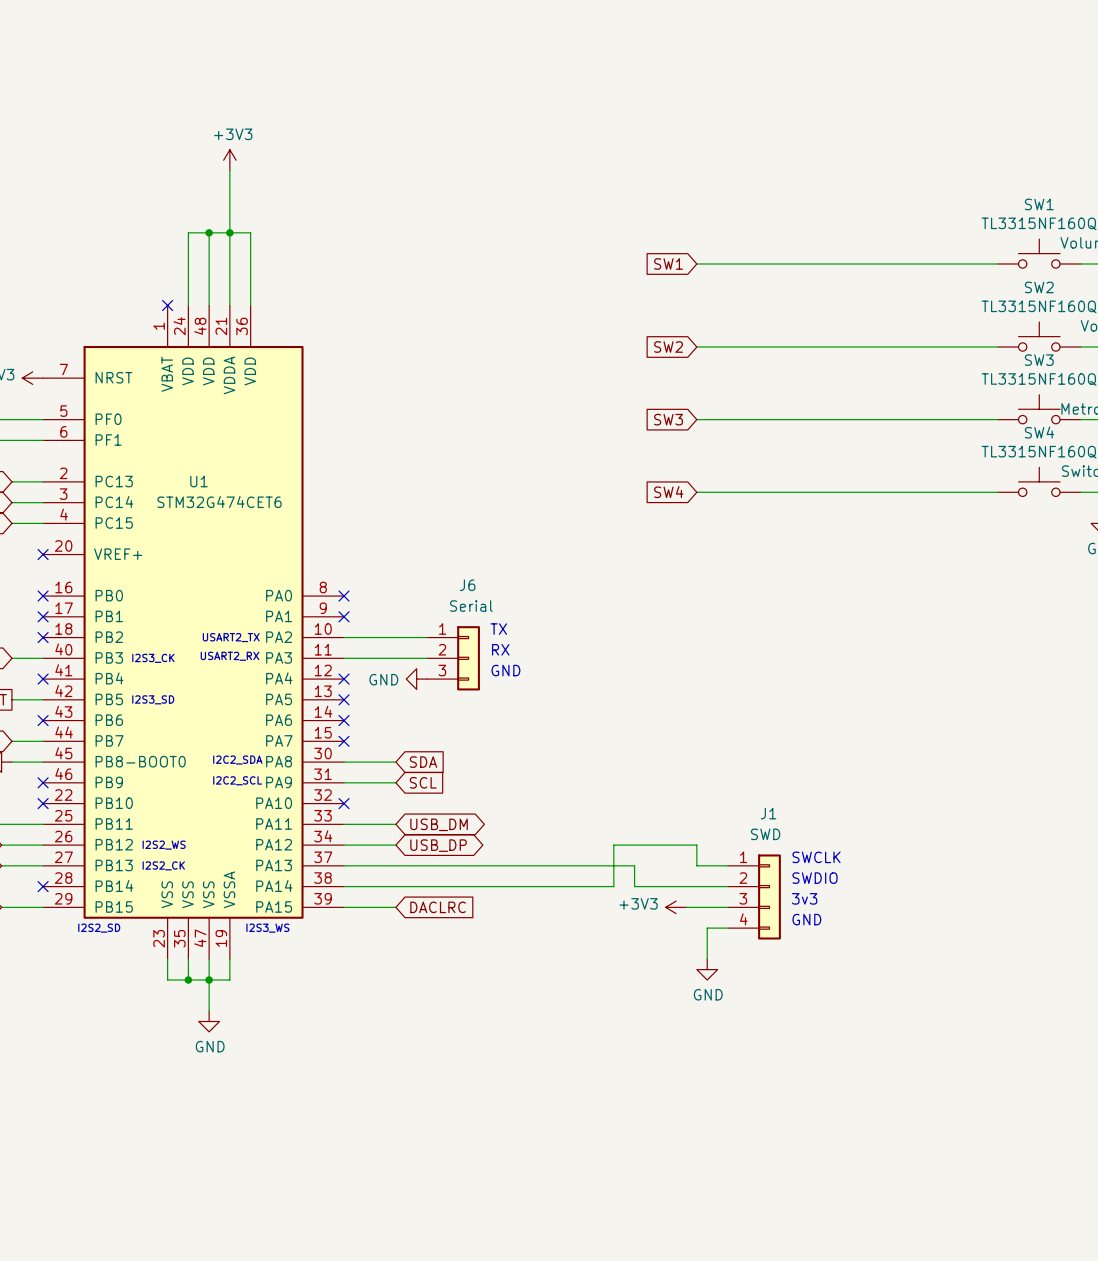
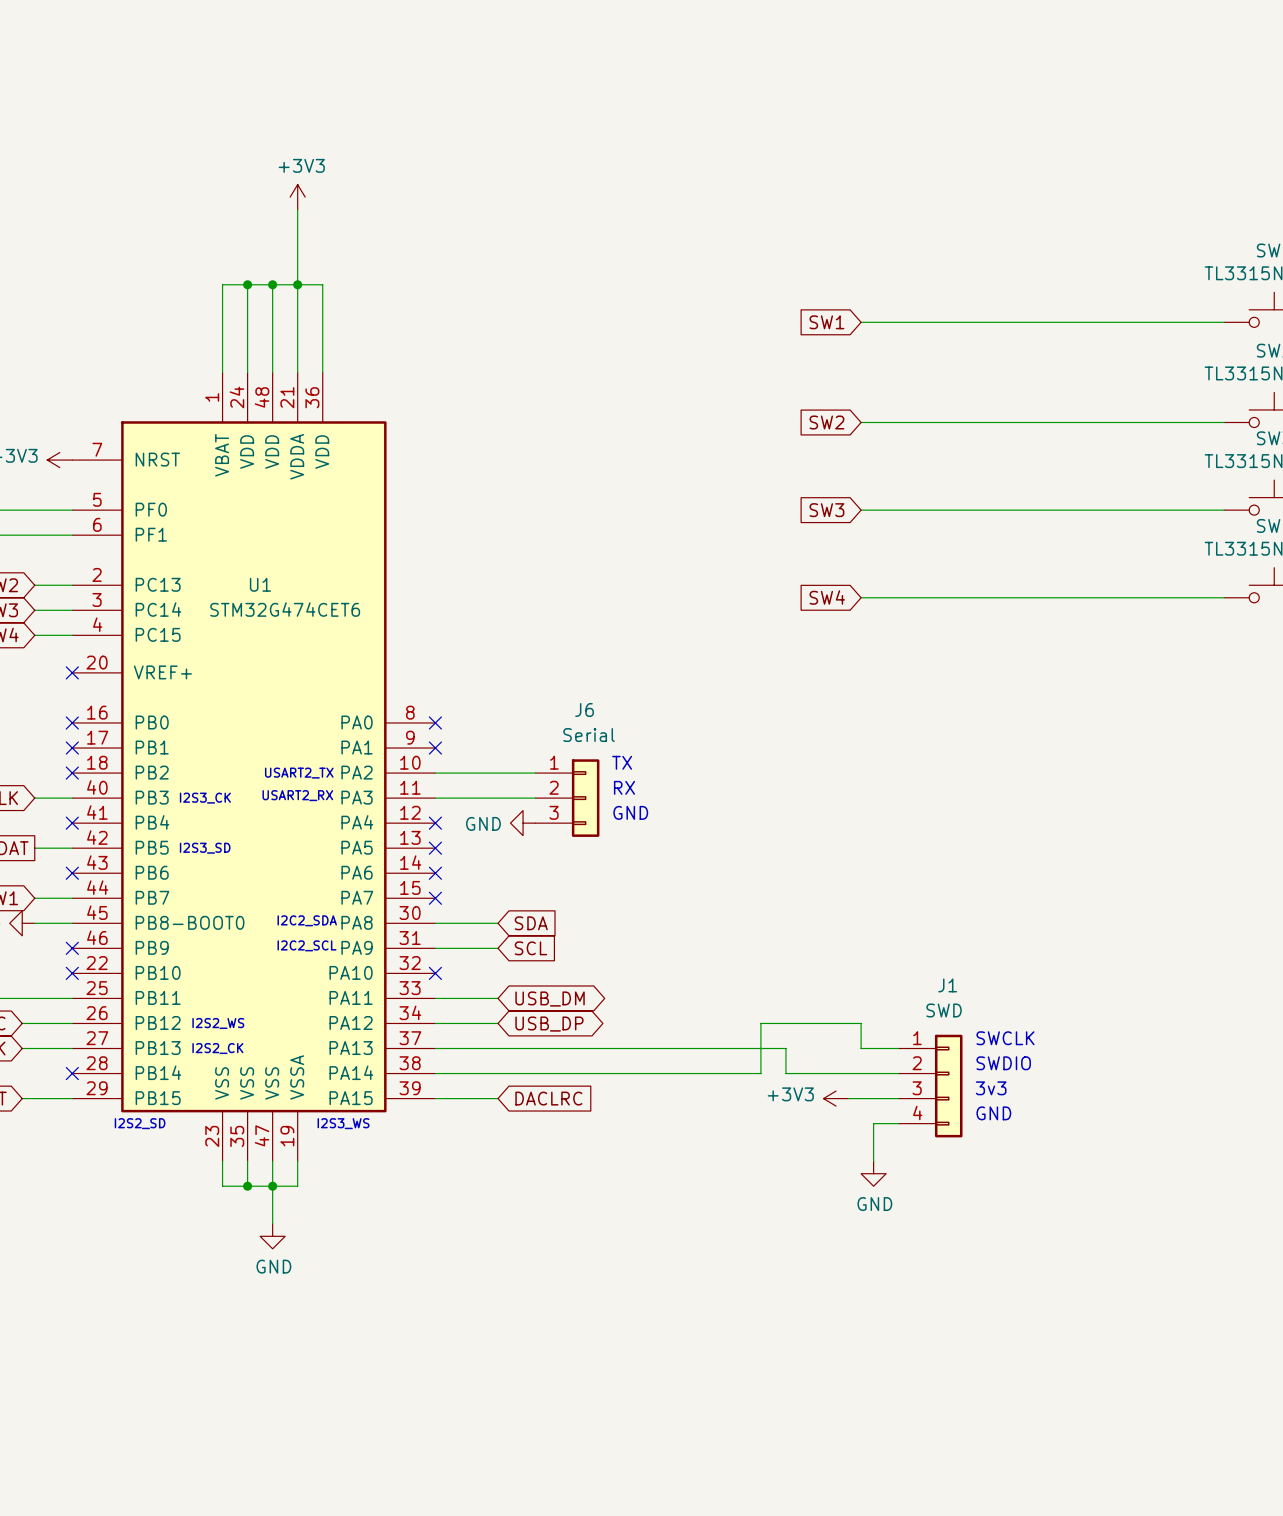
wire: none -> (247, 284) (222, 284) (222, 372)
junction: none -> (247, 284)
no-connect mark: (167, 305) -> none

